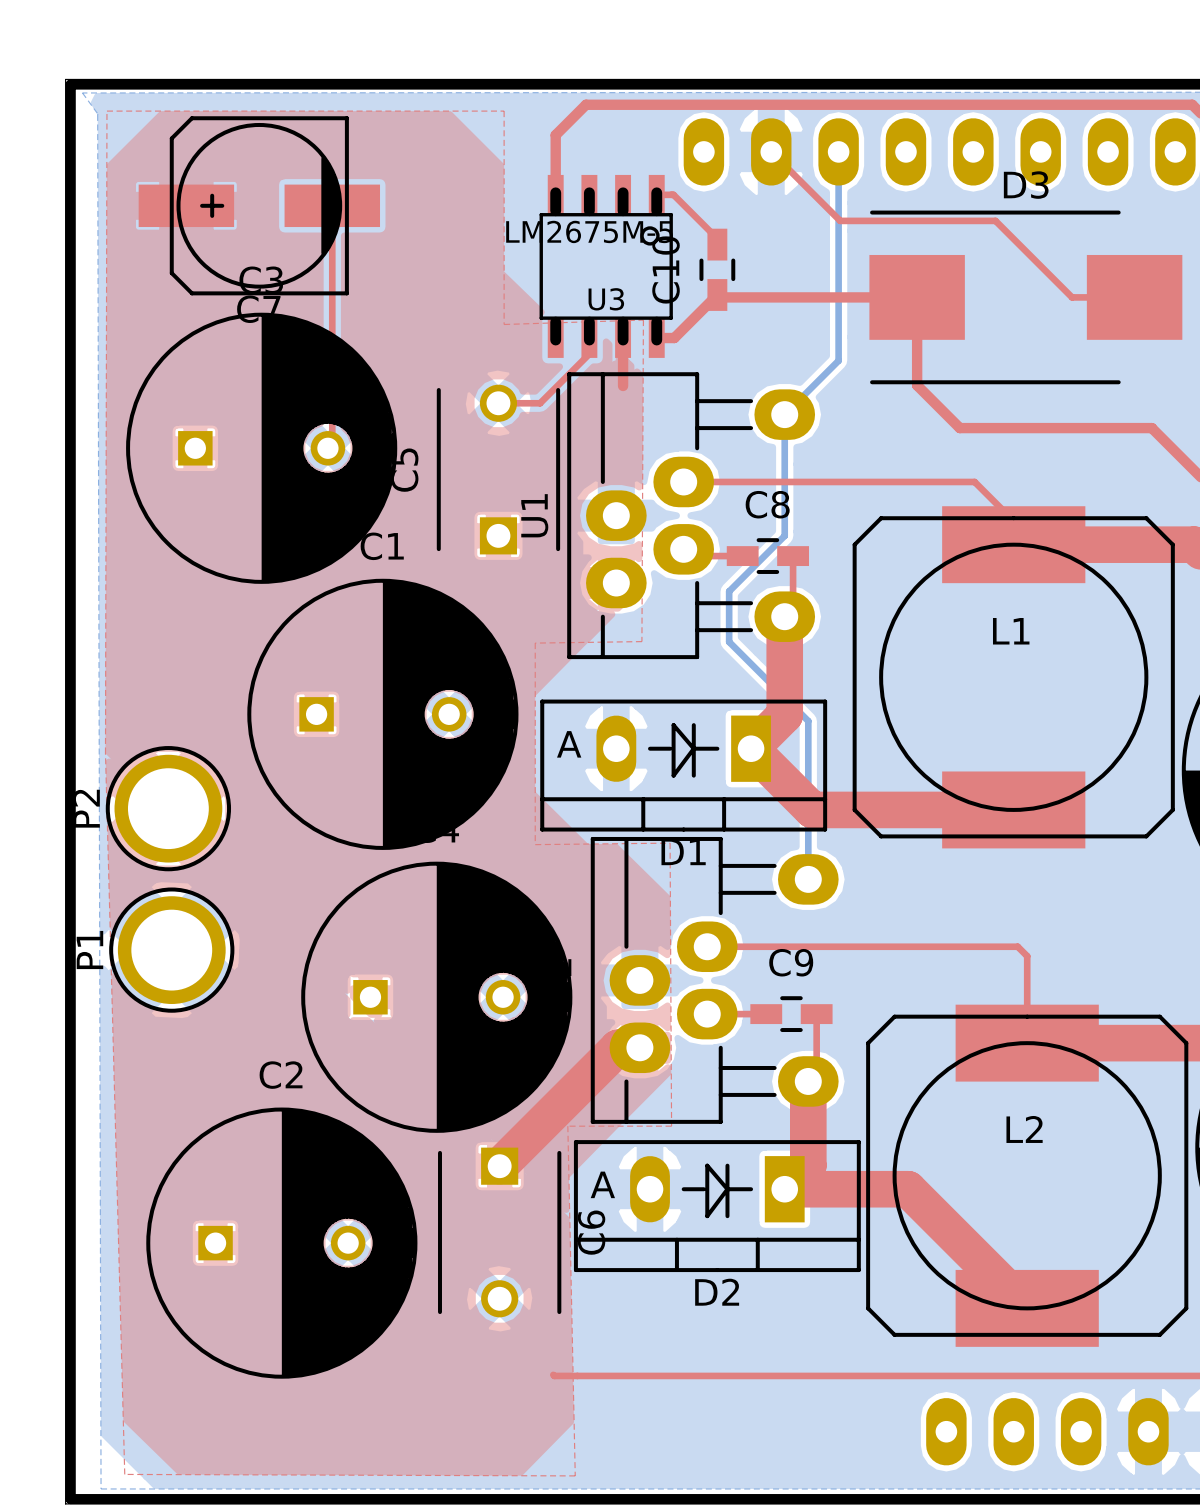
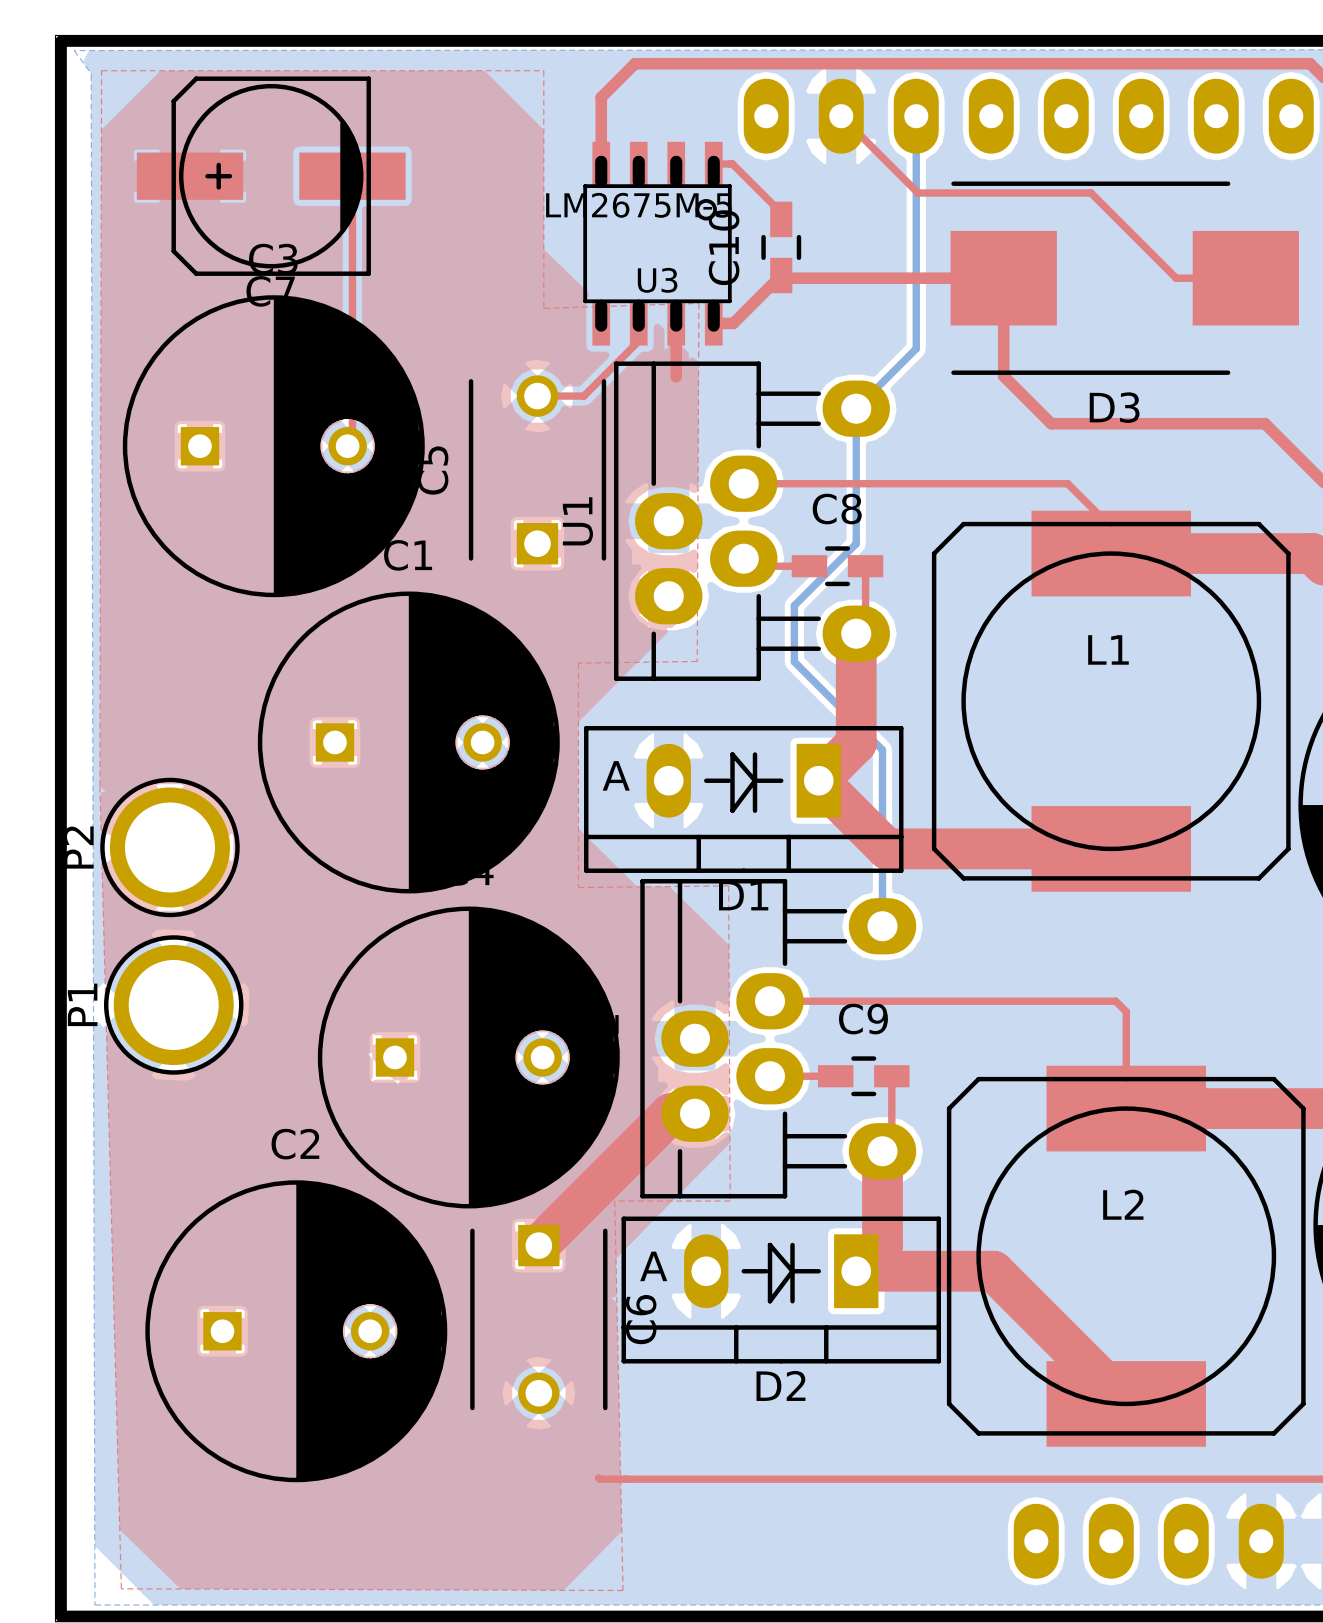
D3 name position: D3 (1026, 185) -> D3 (1114, 407)

